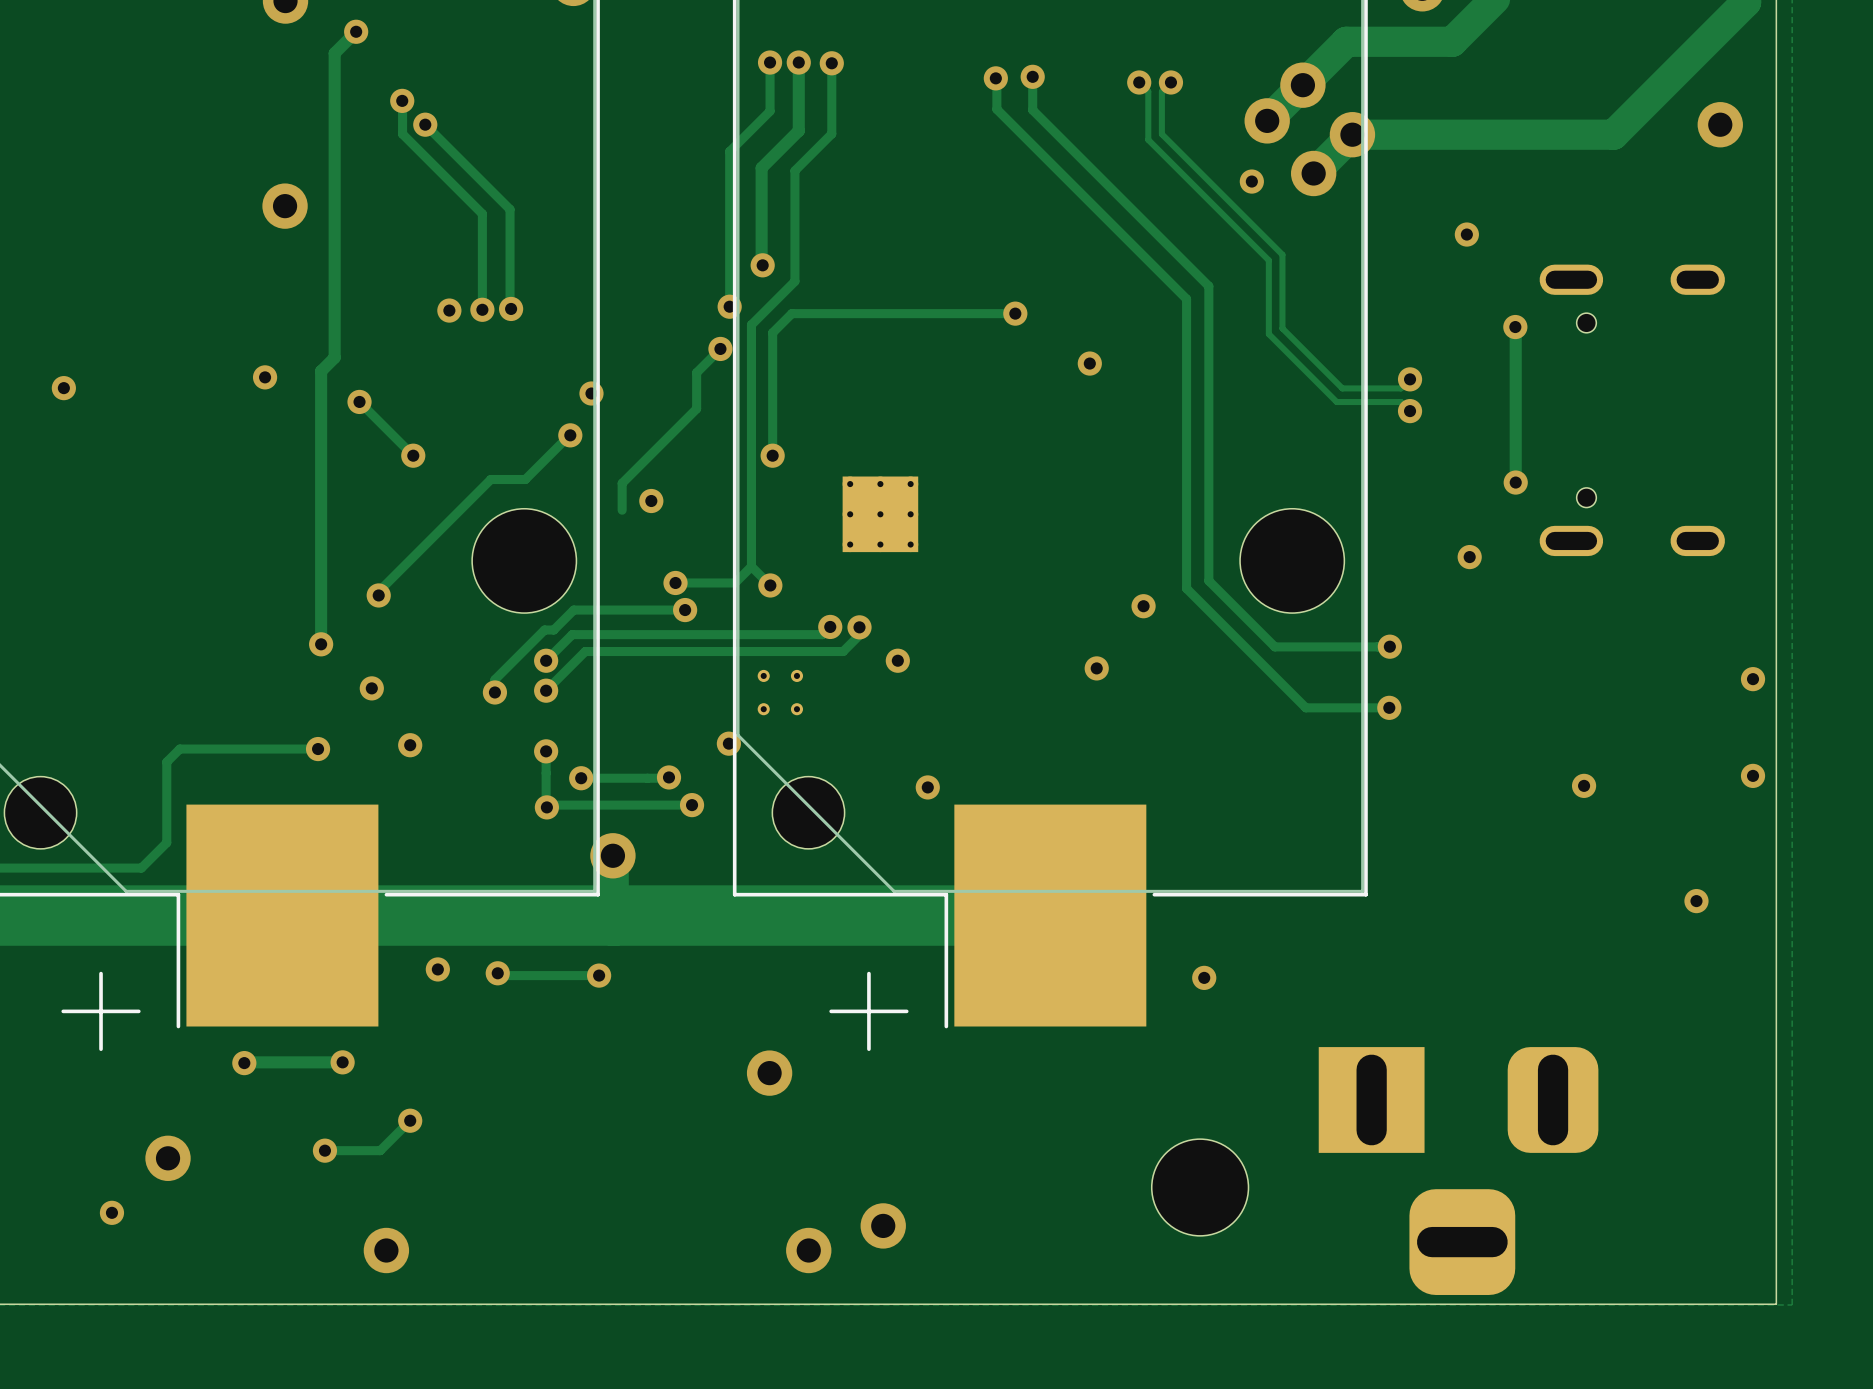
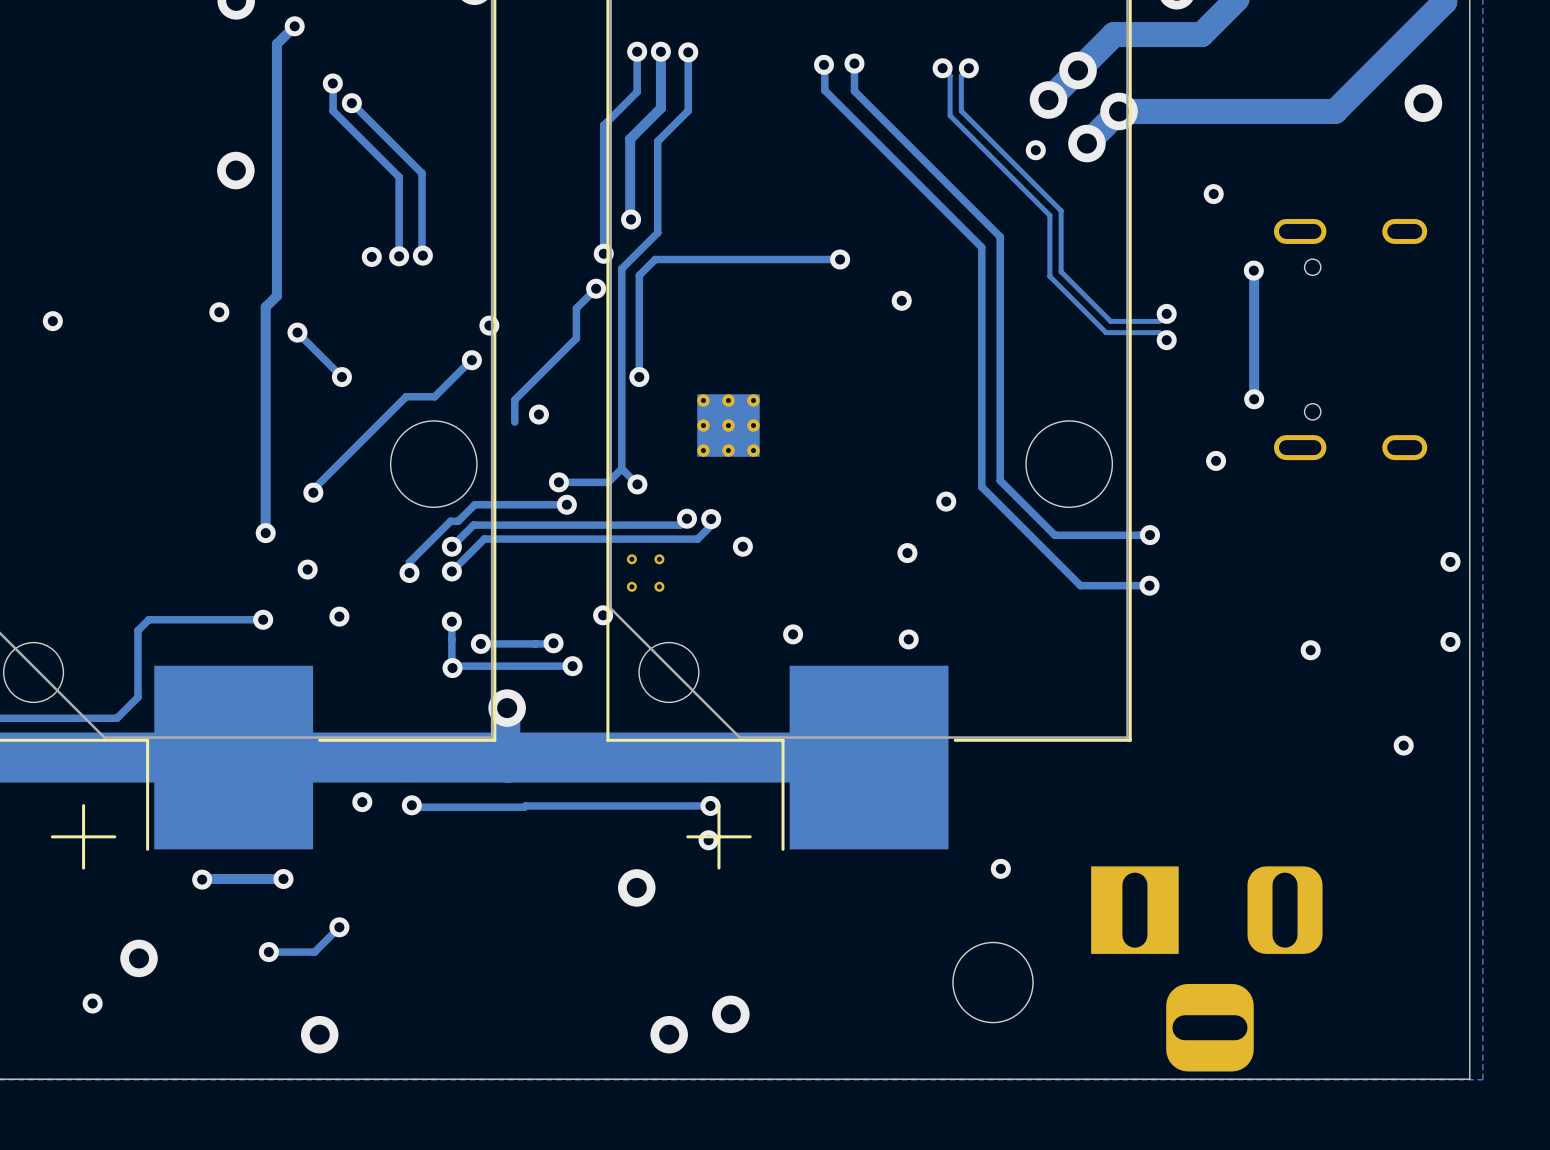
via: none -> (908, 639)
via position: (927, 787) -> (793, 634)
track: none -> (710, 805) (495, 807)
via: none -> (710, 805)
via: (599, 975) -> none
via position: (1204, 977) -> (1000, 868)
via: none -> (708, 840)

